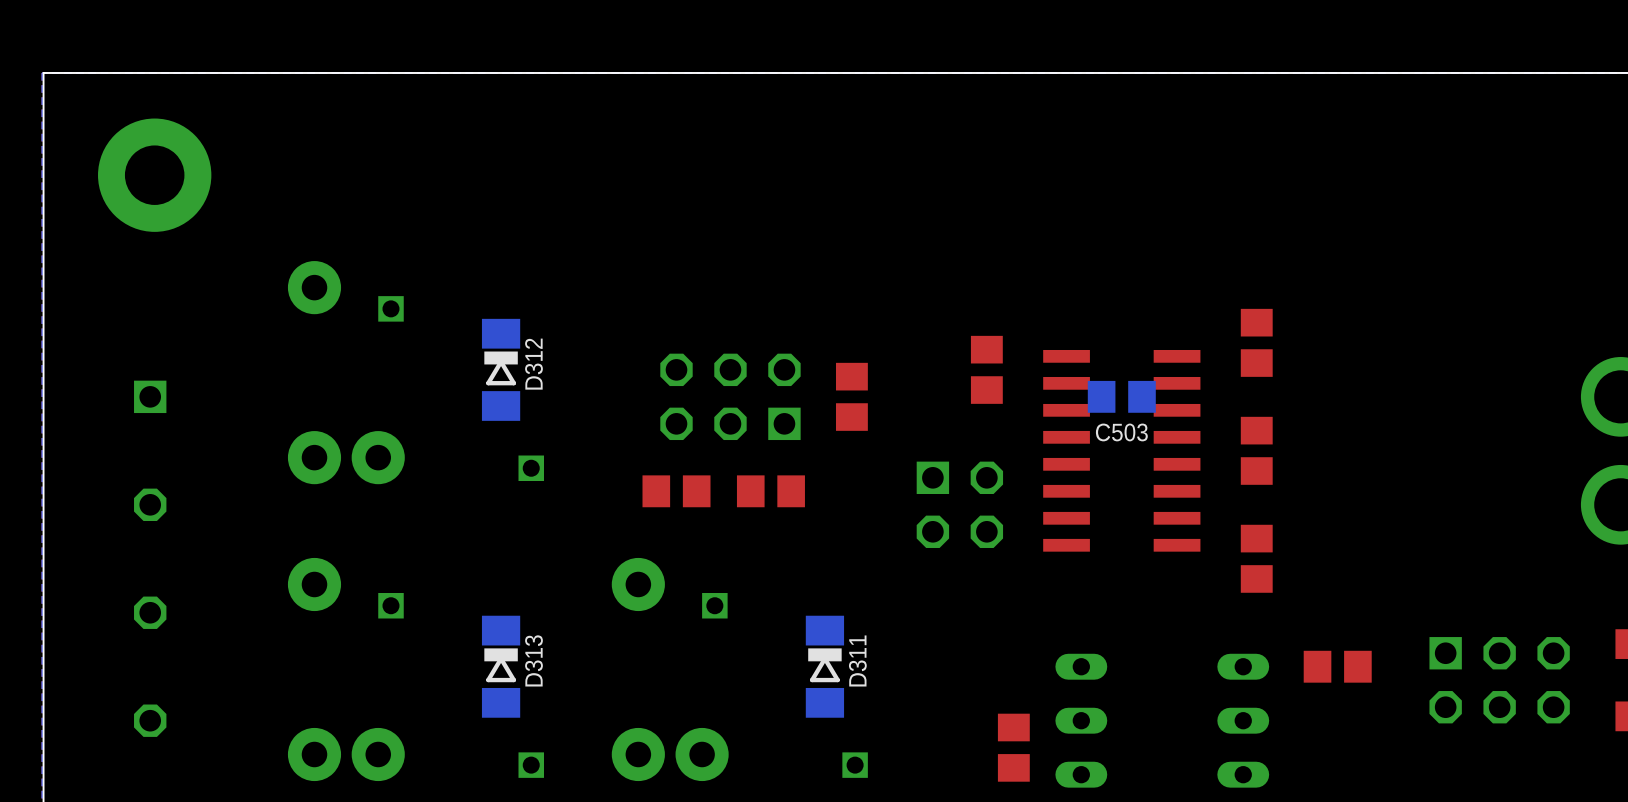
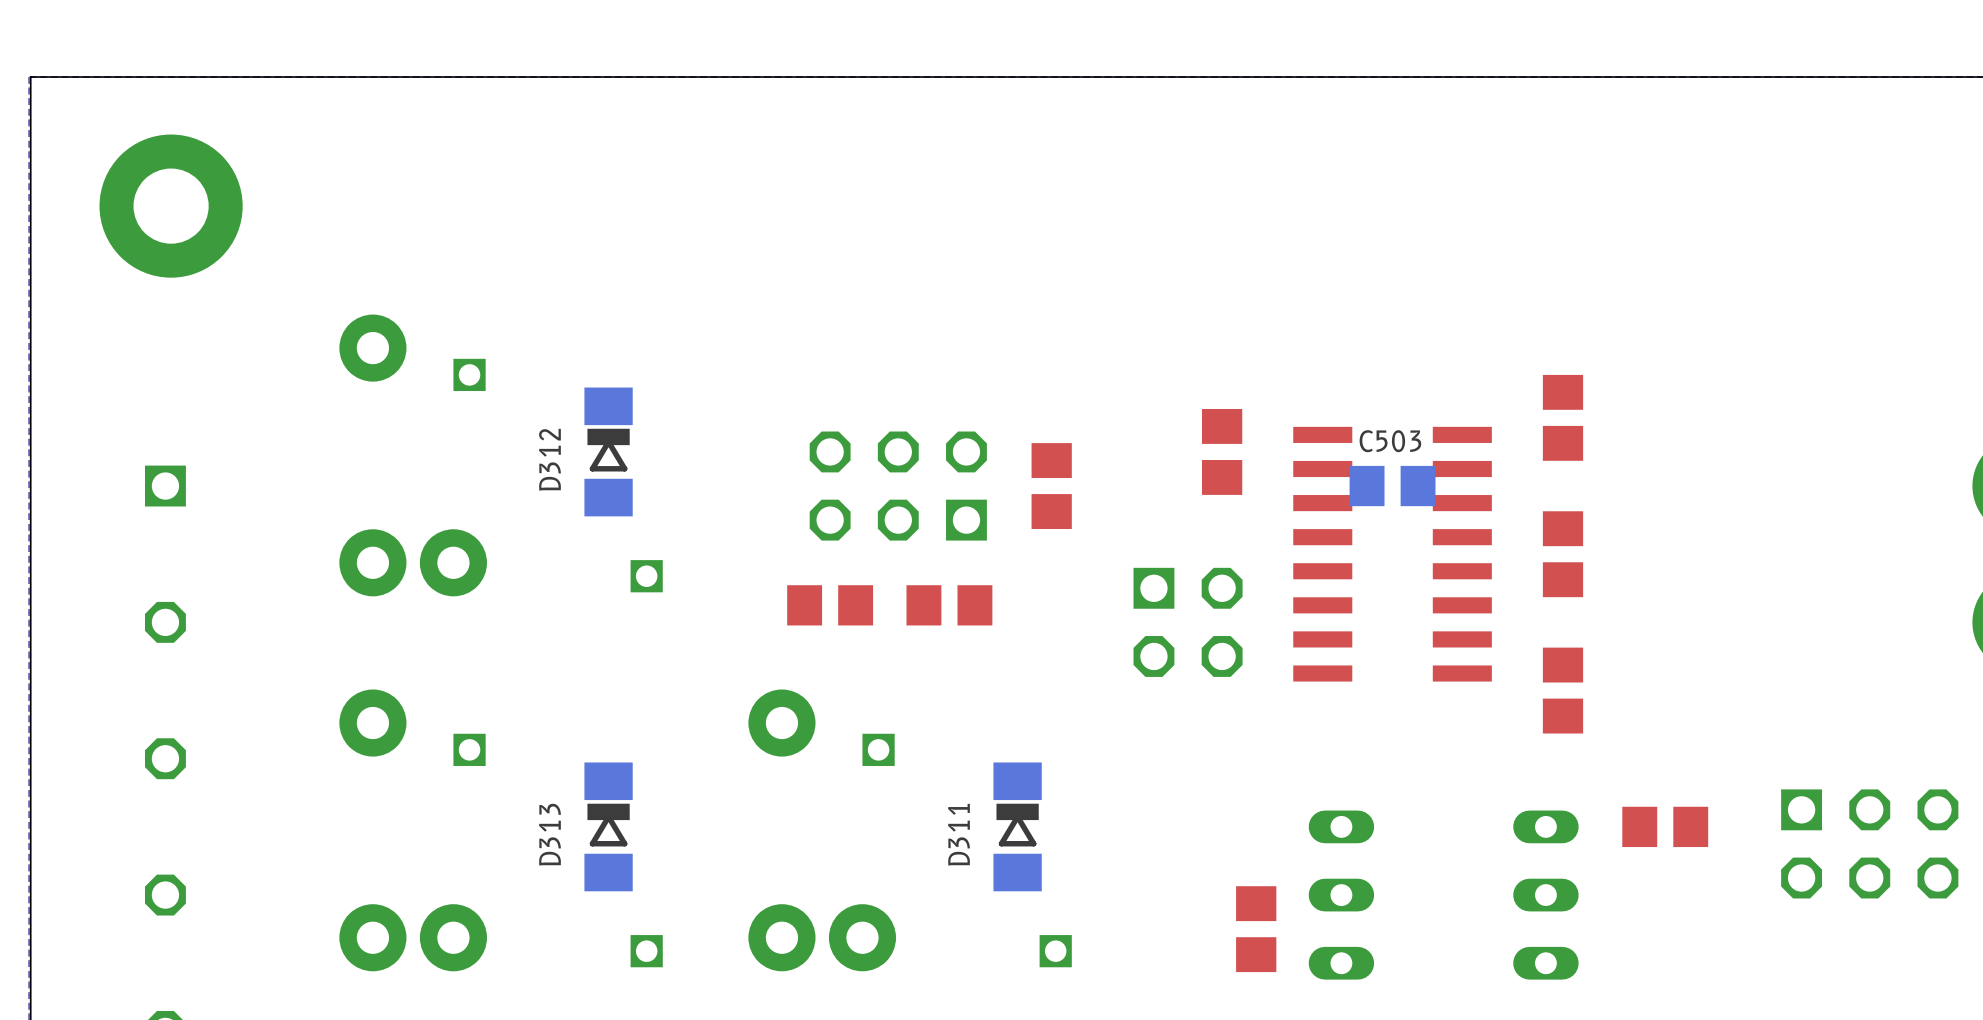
D312 name position: D312 (533, 364) -> D312 (549, 459)
C503 name position: C503 (1121, 432) -> C503 (1390, 441)
D313 name position: D313 (533, 660) -> D313 (549, 834)
D311 name position: D311 (857, 660) -> D311 (958, 834)

